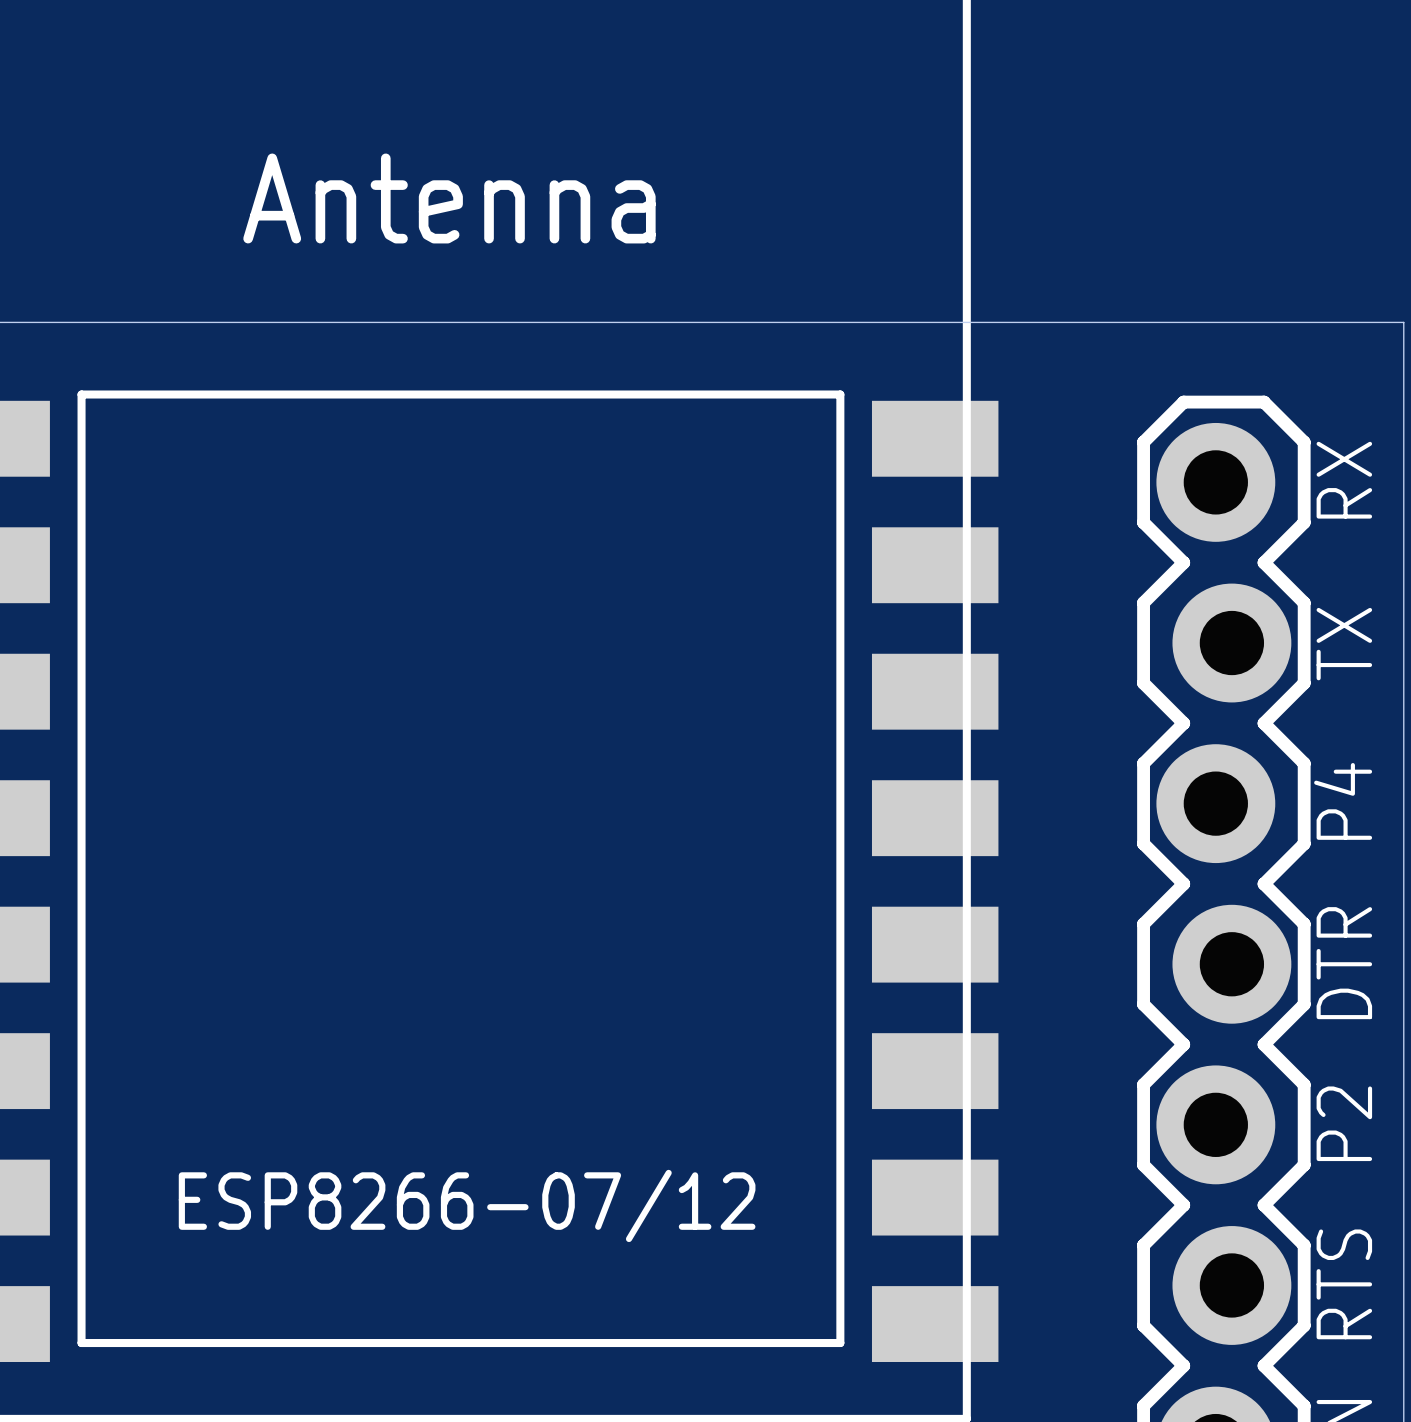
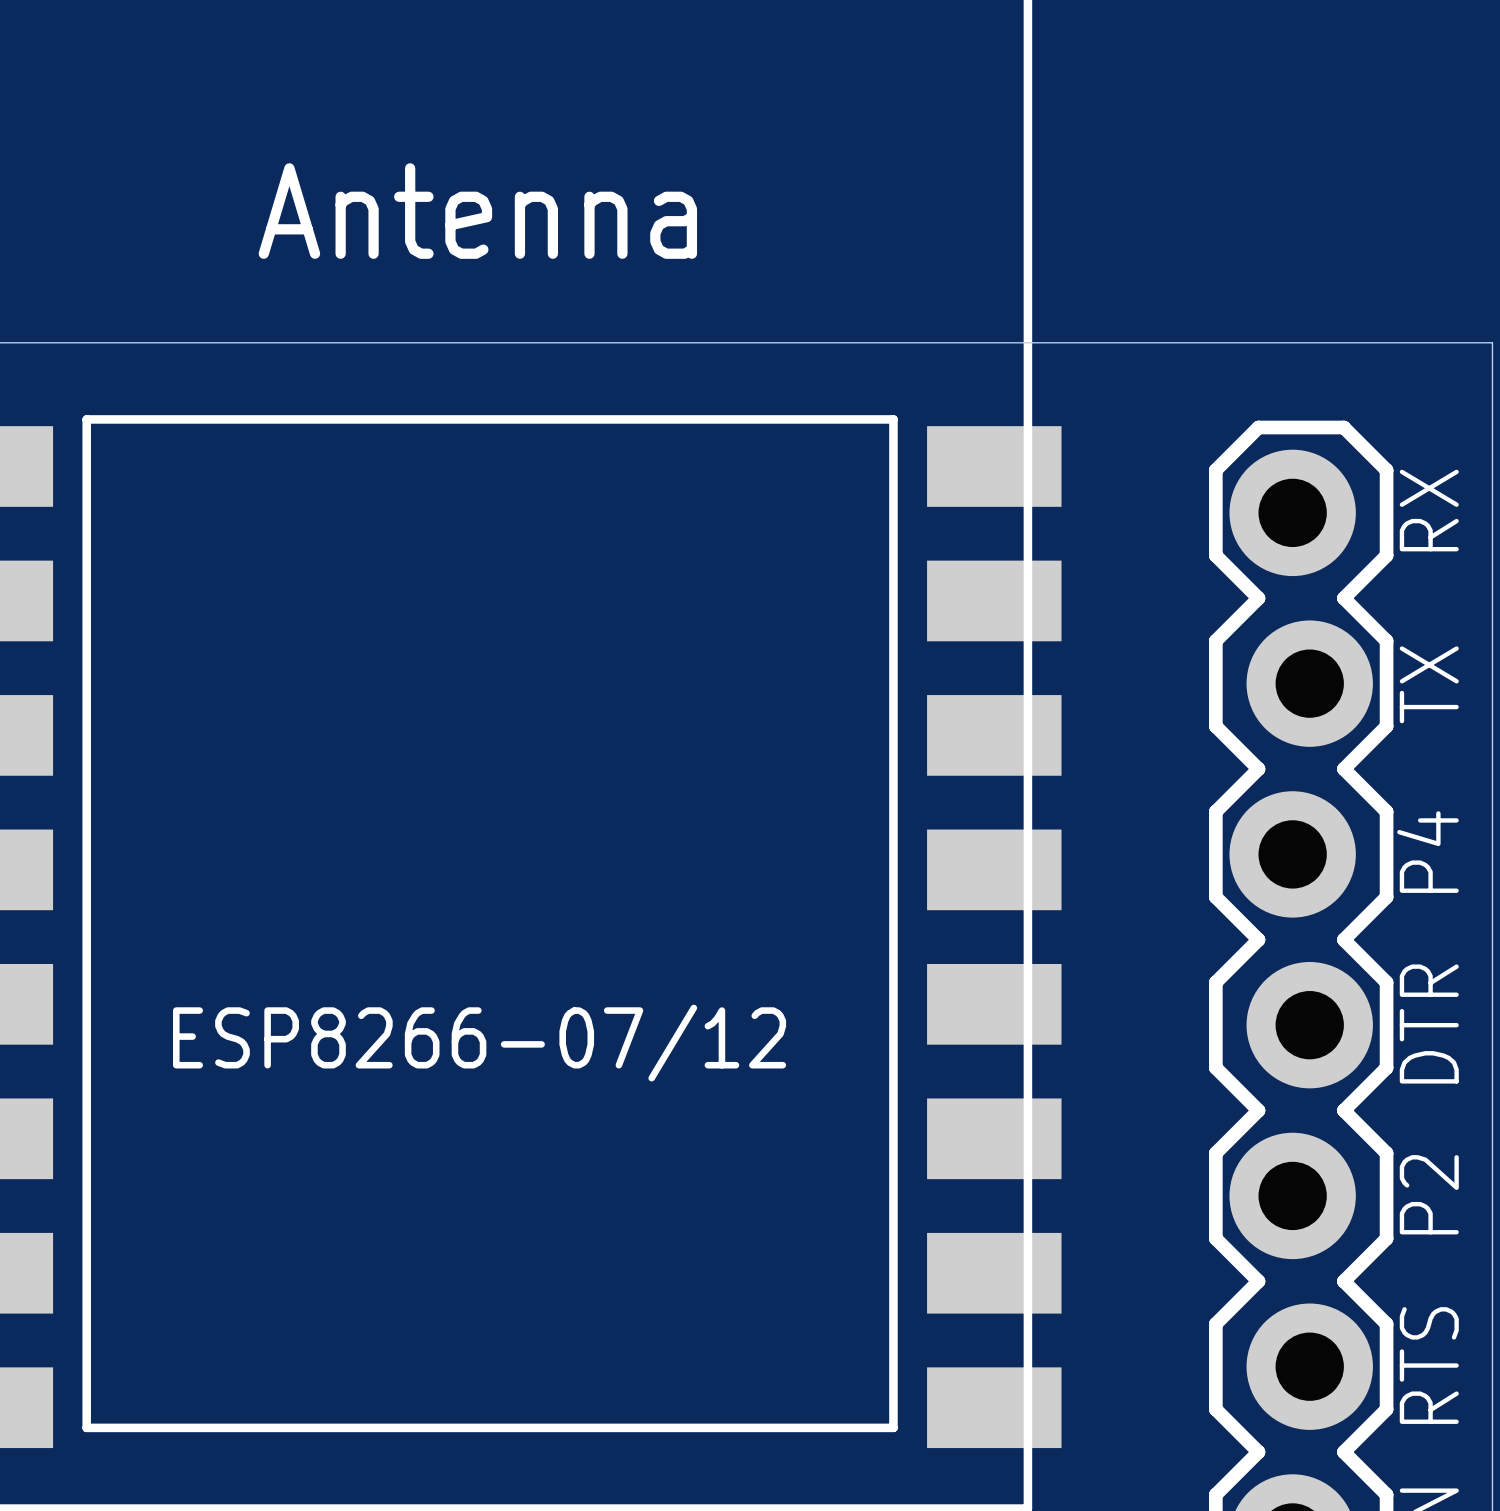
ESP8266-07/12 name position: ESP8266-07/12 (467, 1205) -> ESP8266-07/12 (479, 1043)

